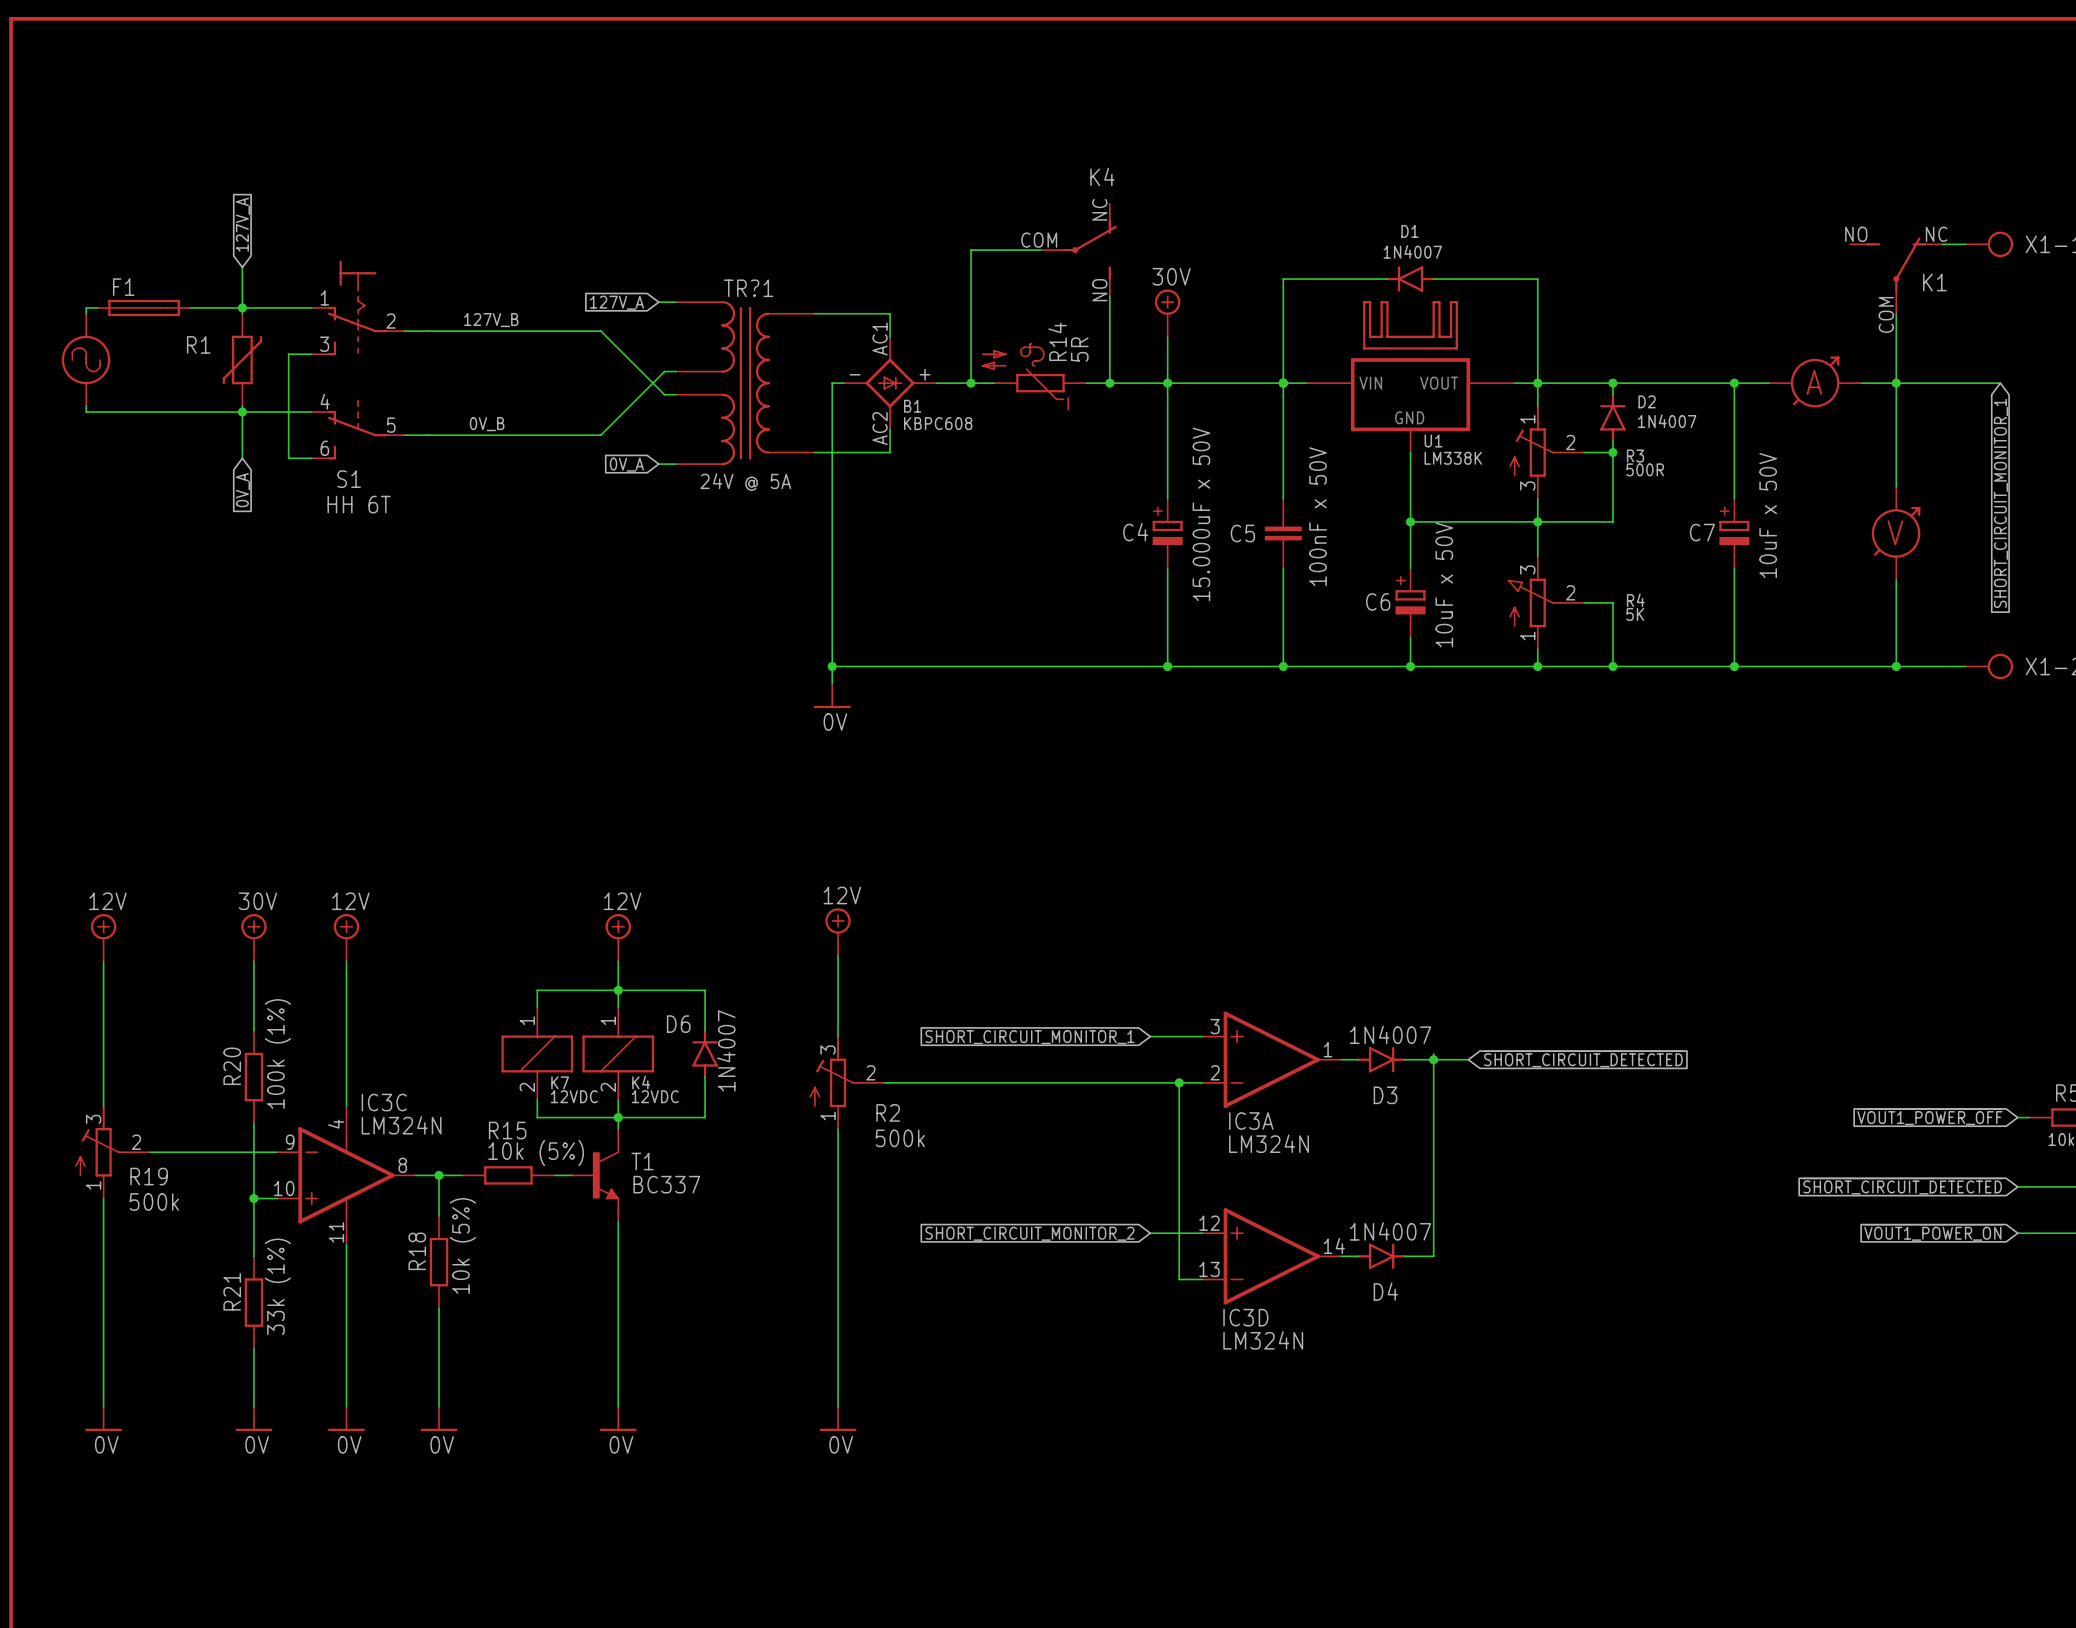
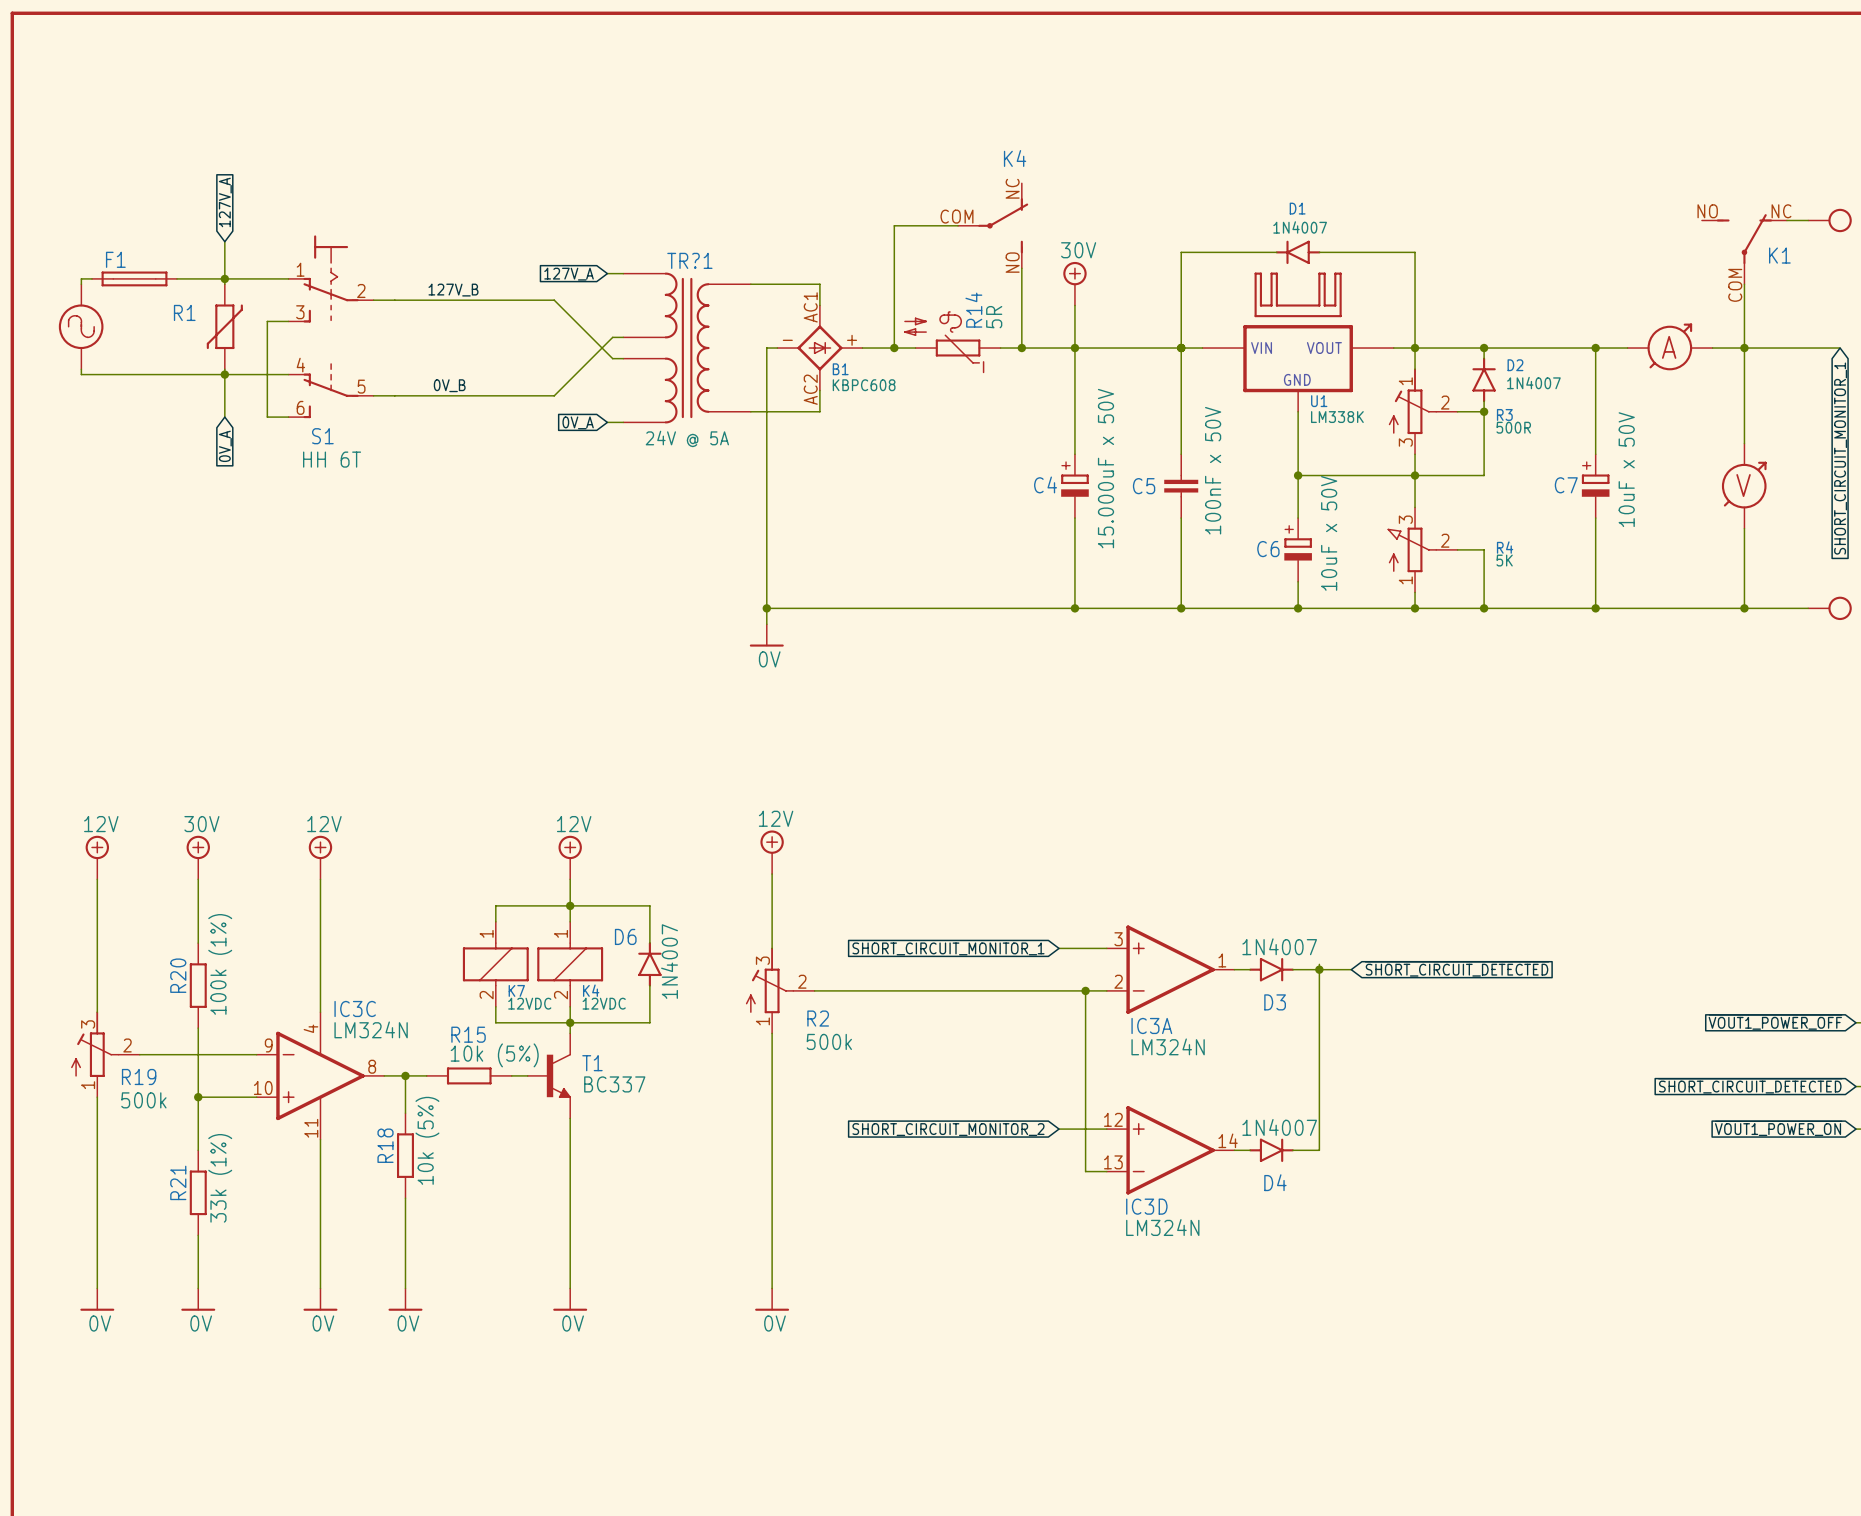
power symbol position: 30V (253, 937) -> 30V (198, 857)
wire: (253, 961) (253, 1030) -> (198, 879) (198, 943)
R20 position: (253, 1077) -> (198, 985)
wire: (253, 1123) (253, 1256) -> (198, 1028) (198, 1150)
wire: none -> (198, 1097) (235, 1097)
junction position: (253, 1198) -> (198, 1097)
R21 position: (253, 1302) -> (198, 1192)
wire: (253, 1348) (253, 1406) -> (198, 1235) (198, 1288)
power symbol position: 0V (253, 1418) -> 0V (198, 1299)

